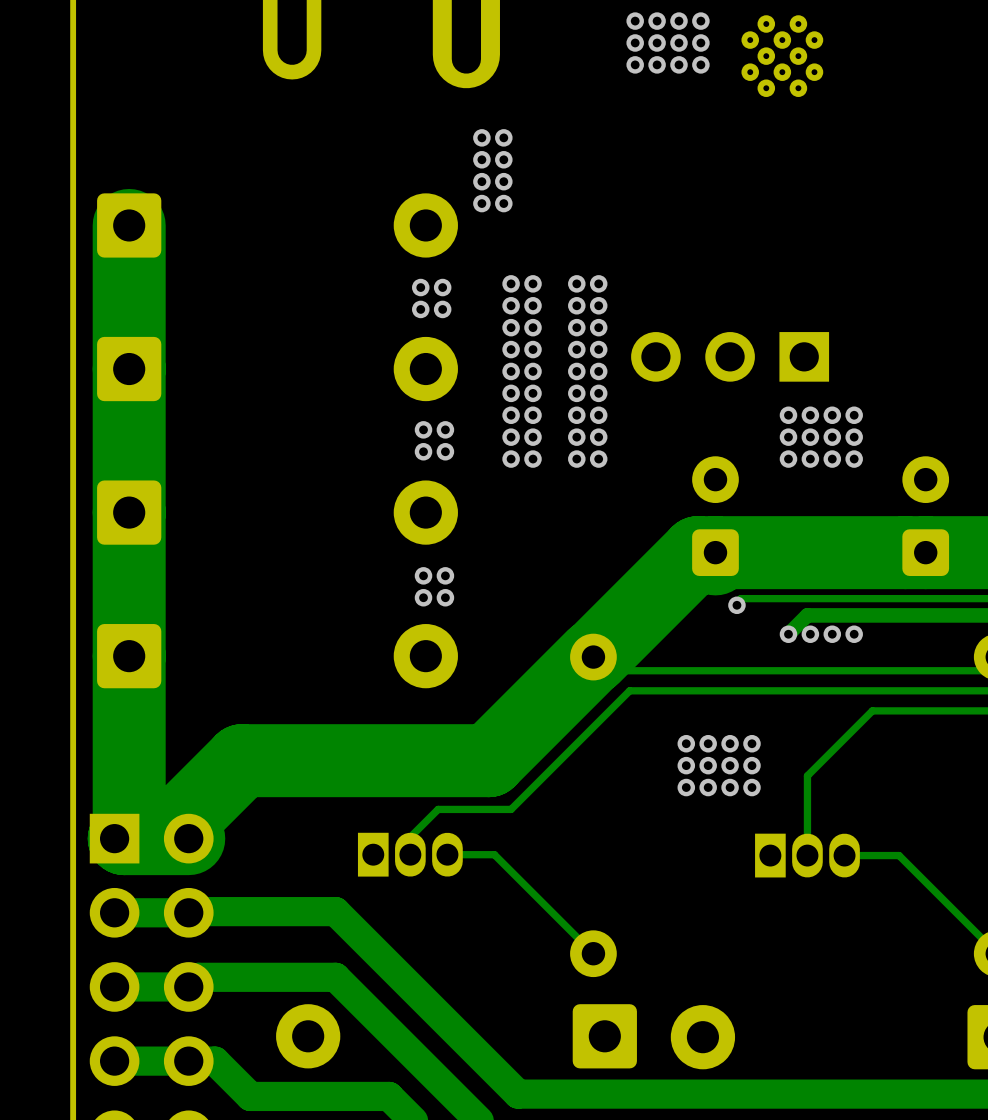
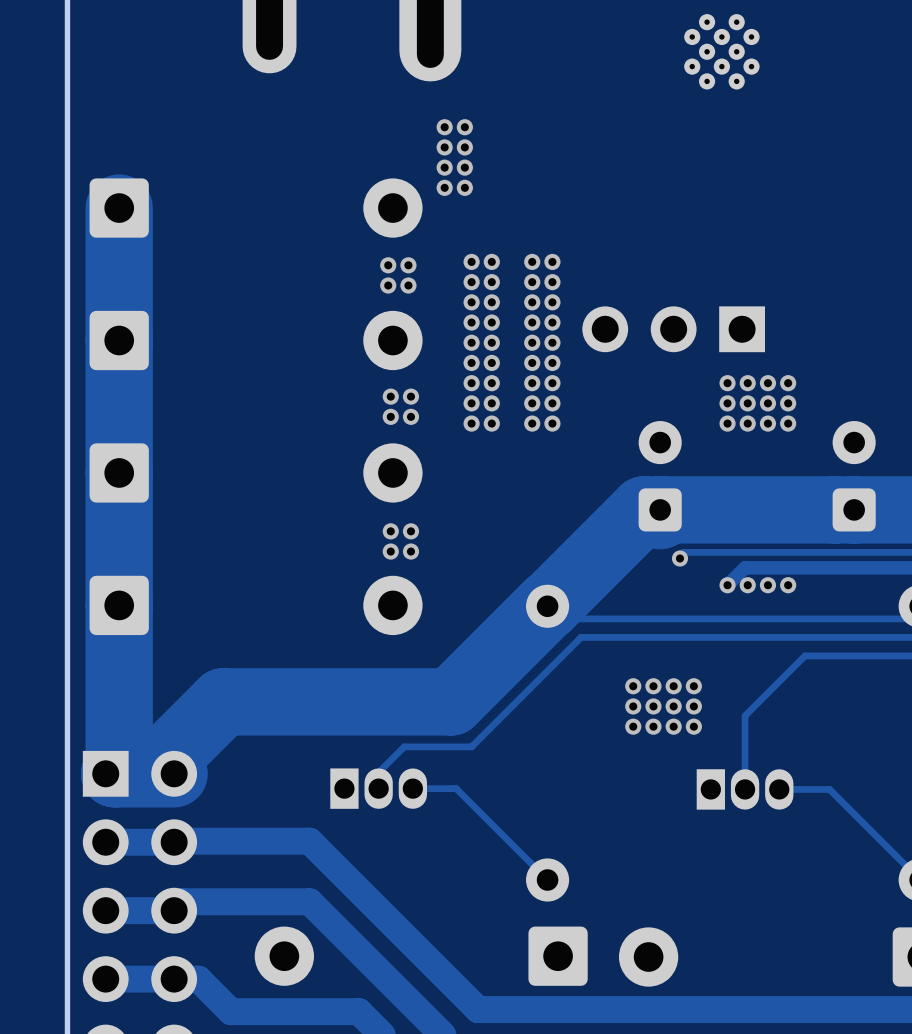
via: (635, 21) -> none
via: (657, 21) -> none
via: (678, 21) -> none
via: (700, 21) -> none
via: (635, 42) -> none
via: (657, 42) -> none
via: (678, 42) -> none
via: (700, 42) -> none
via: (635, 64) -> none
via: (657, 64) -> none
via: (678, 64) -> none
via: (700, 64) -> none

